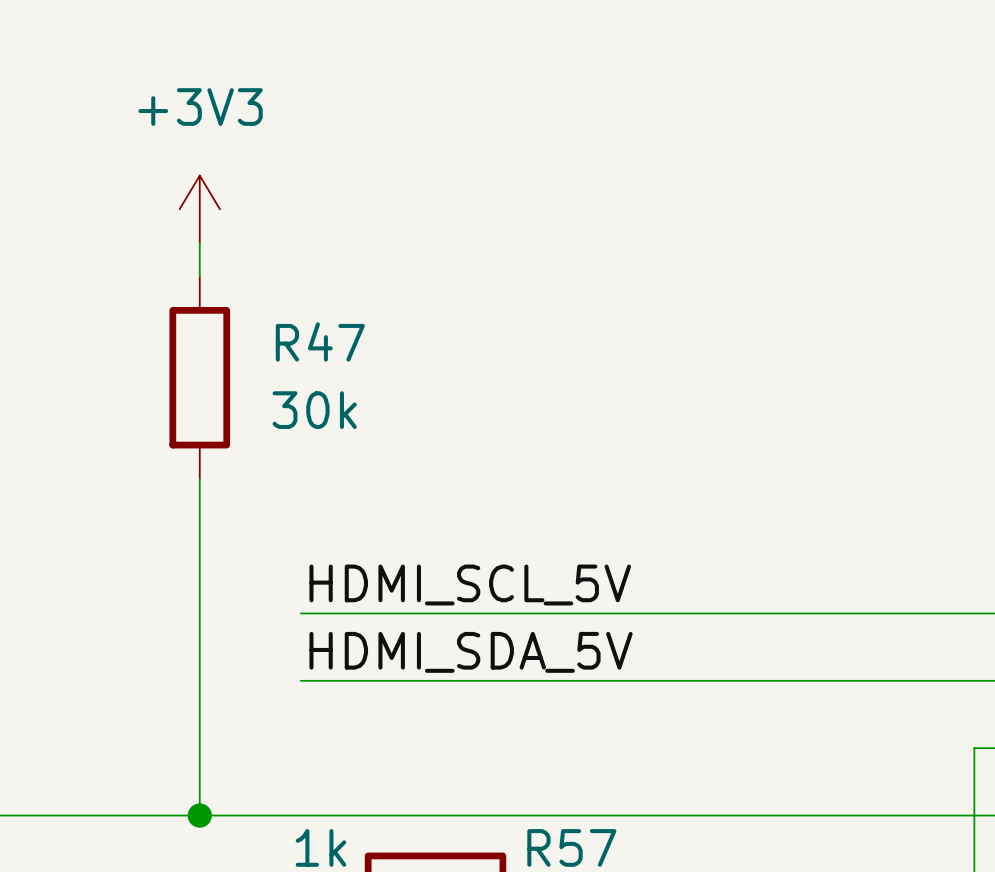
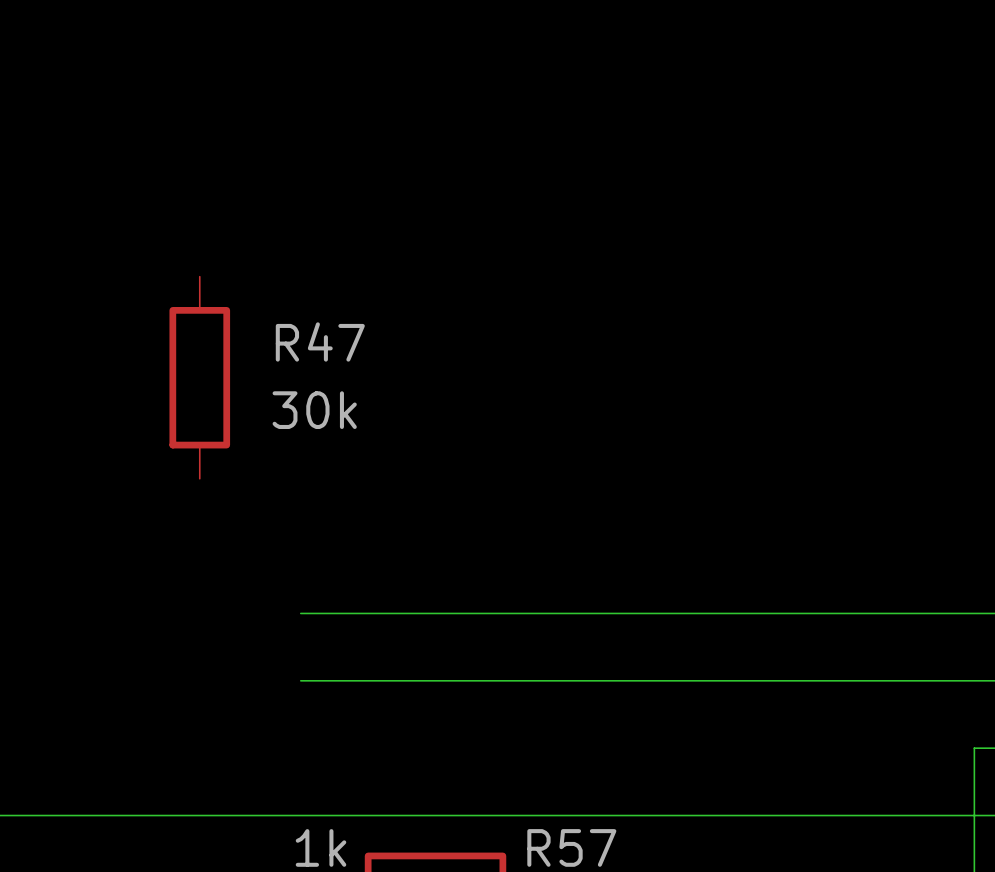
power symbol: +3V3 (199, 209) -> none
wire: (199, 243) (199, 276) -> none
wire: (199, 478) (199, 815) -> none
label: HDMI_SCL_5V (470, 585) -> none
label: HDMI_SDA_5V (471, 652) -> none
junction: (199, 815) -> none

